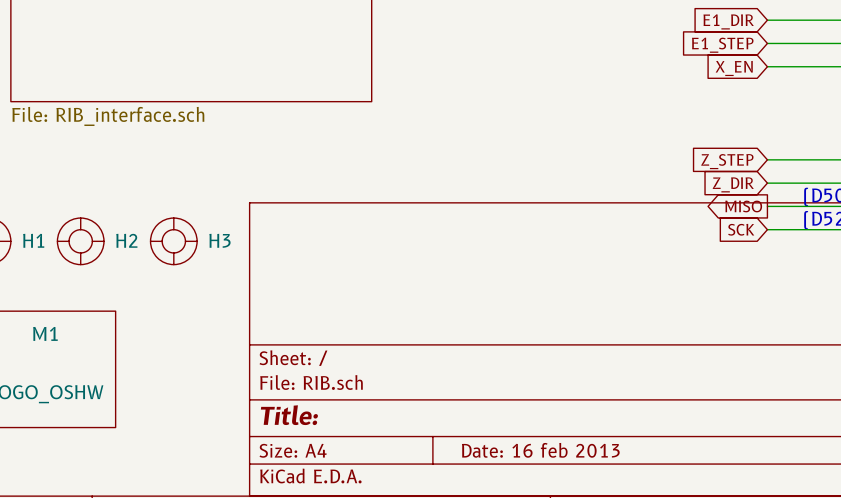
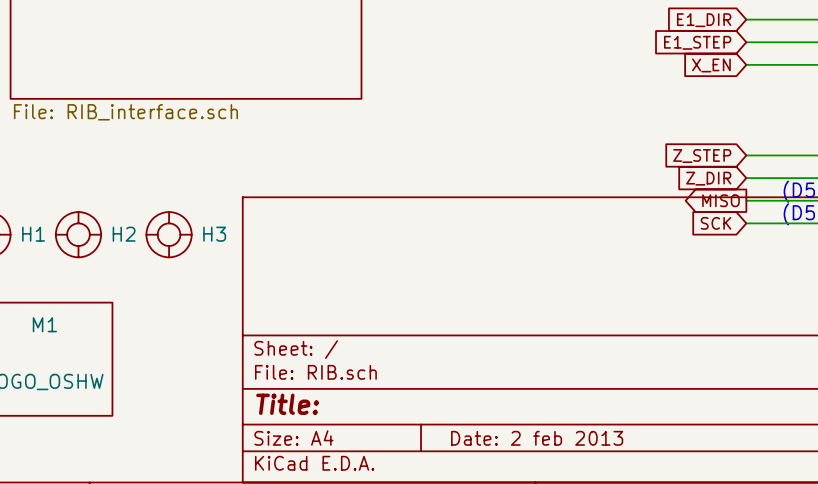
title block: Date: 16 feb 2013 (540, 450) -> Date: 2 feb 2013 (537, 438)

